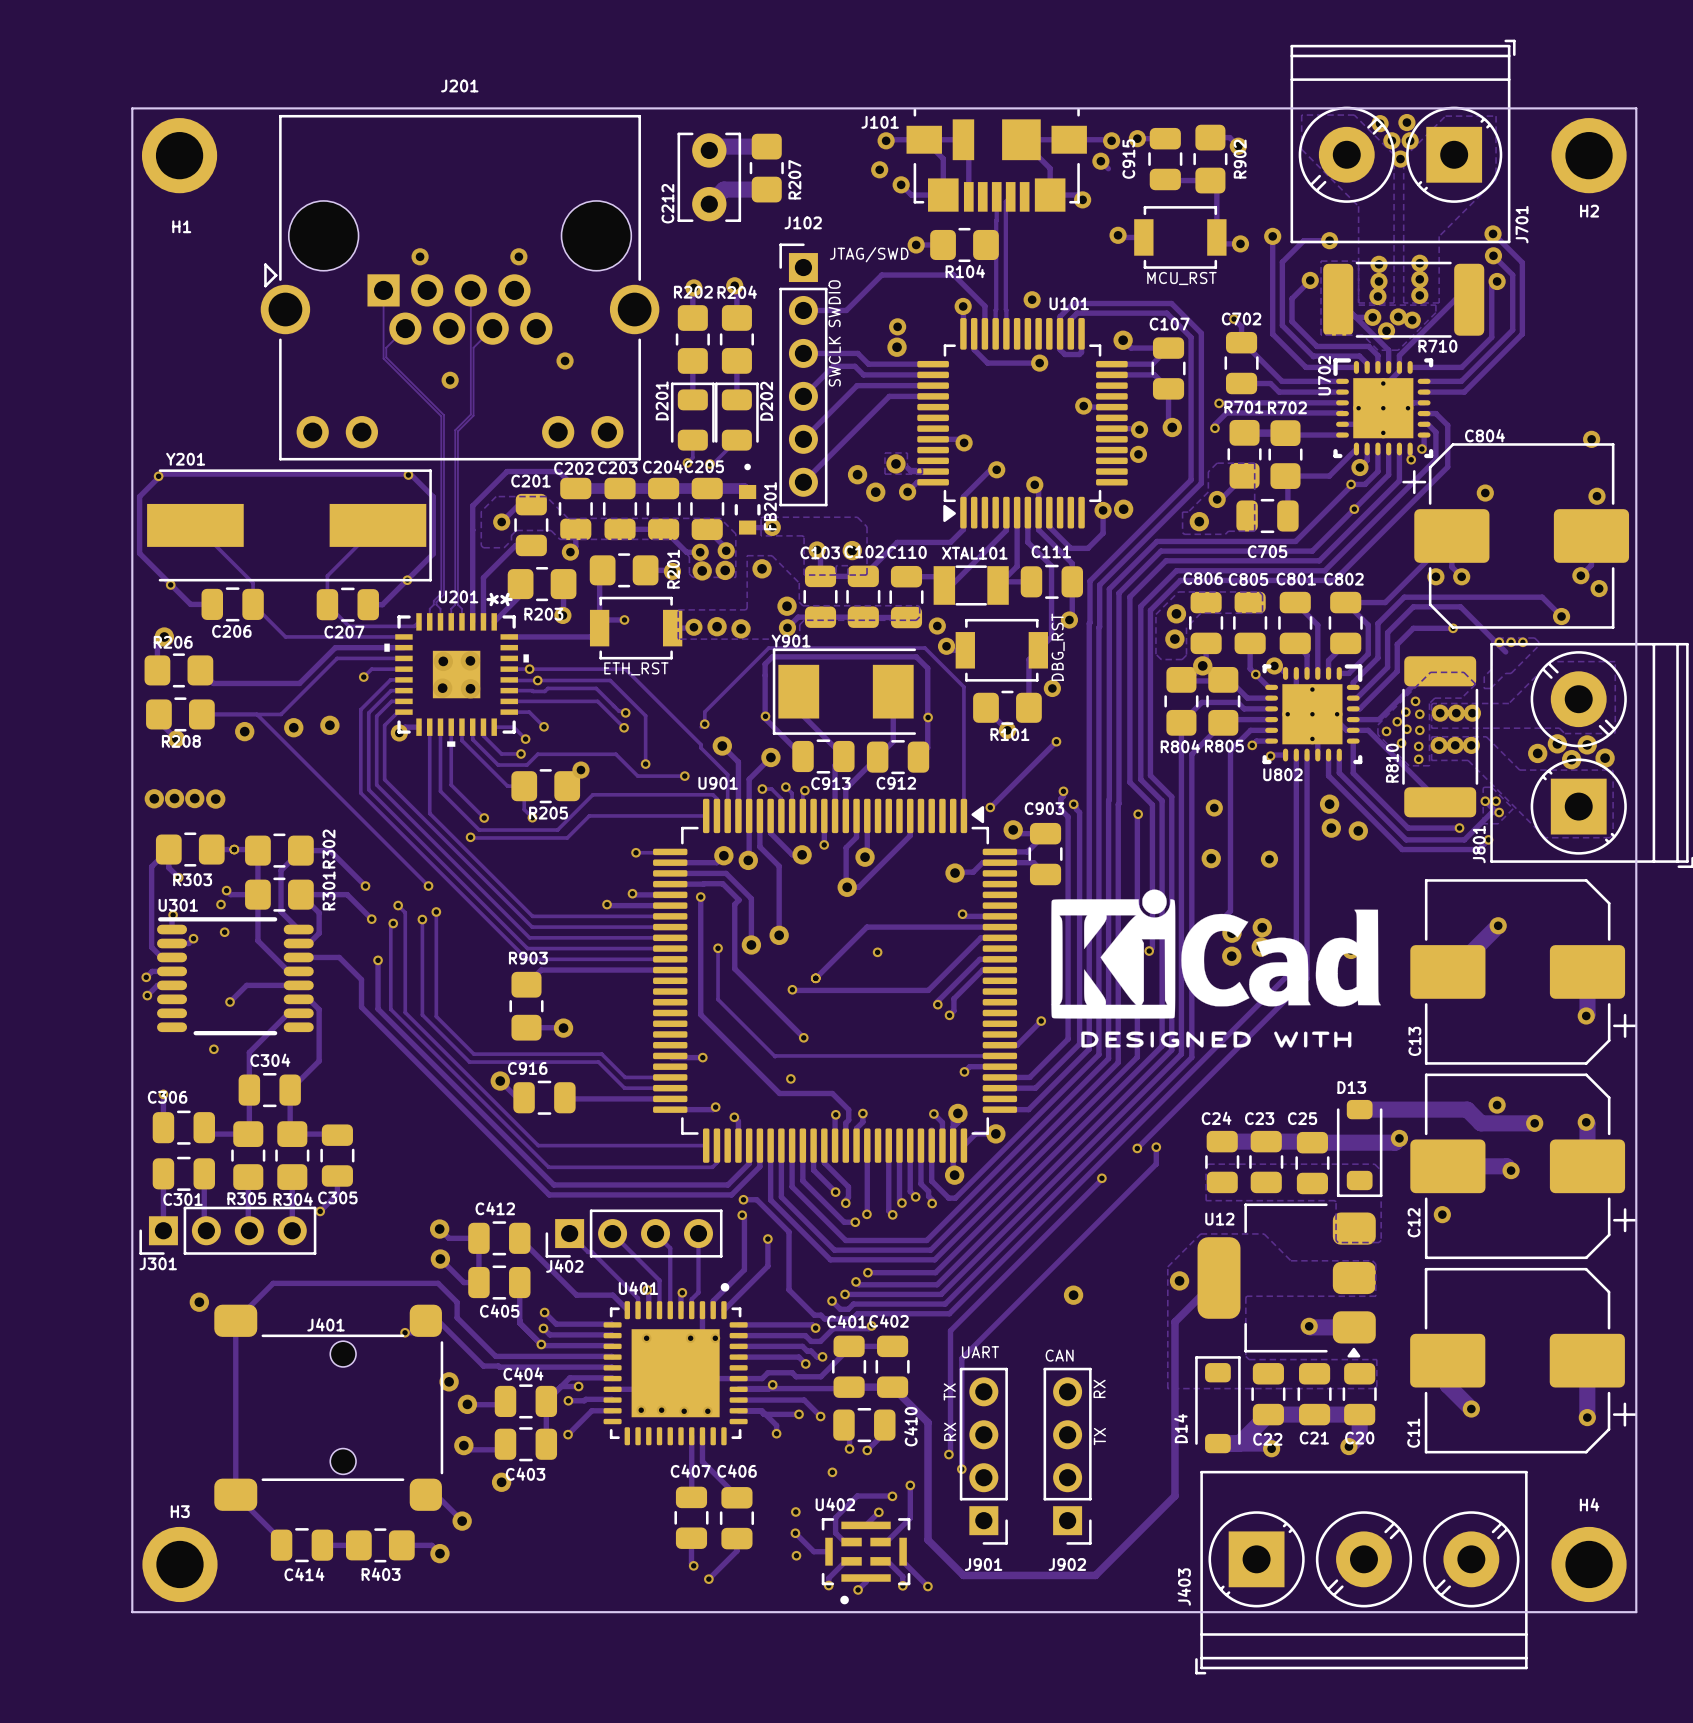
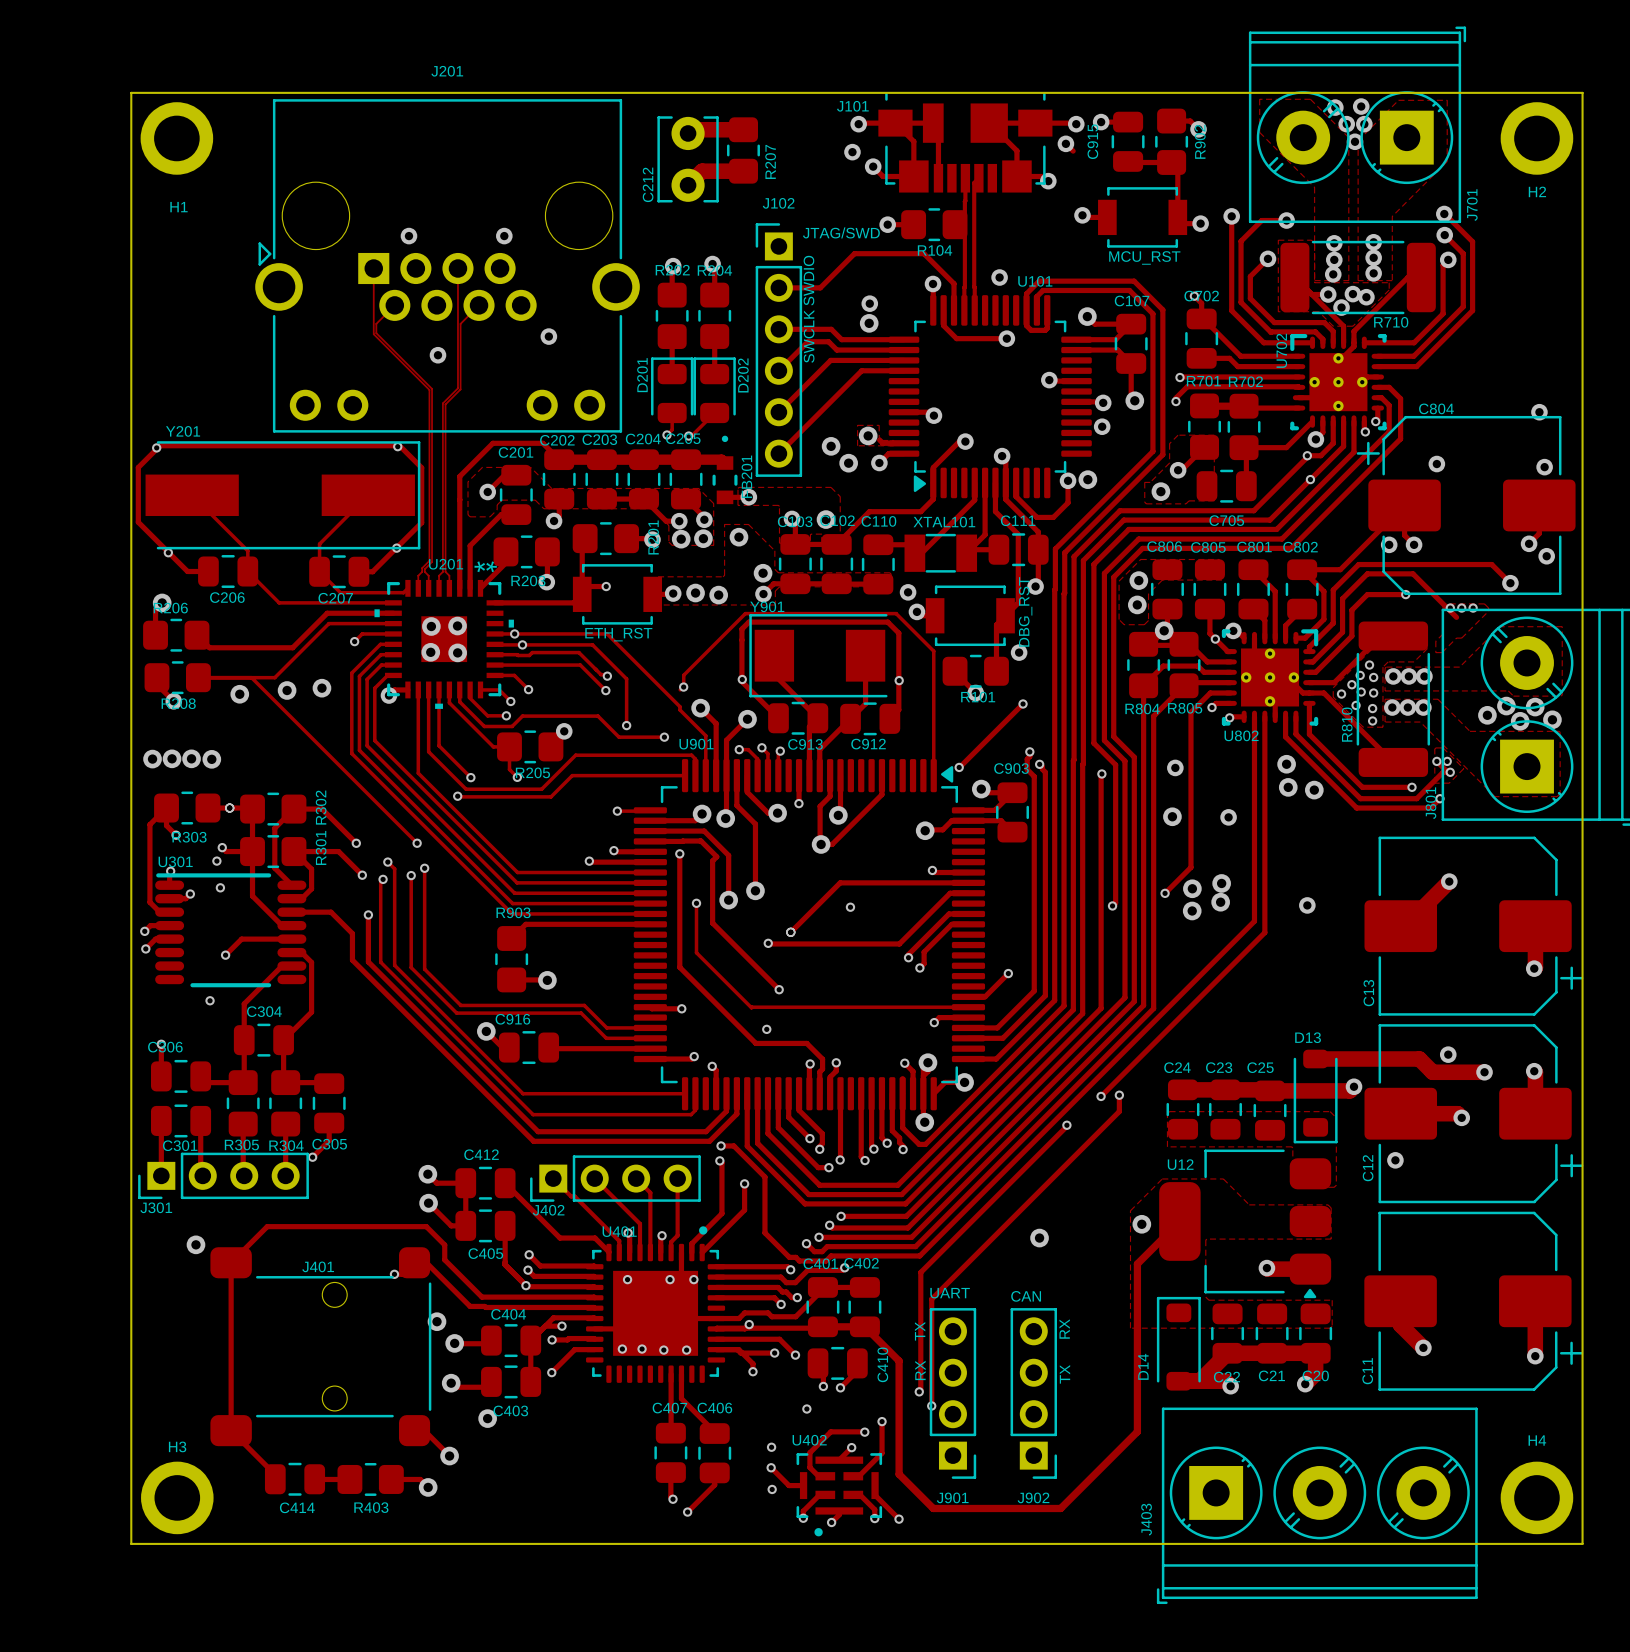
drawing: [1051, 889, 1381, 1048] -> none

